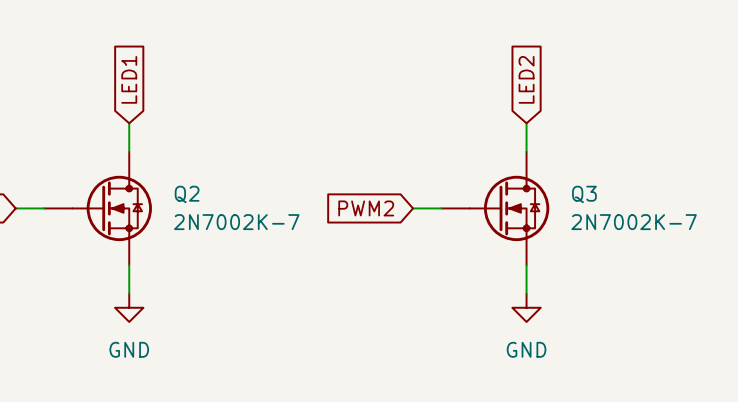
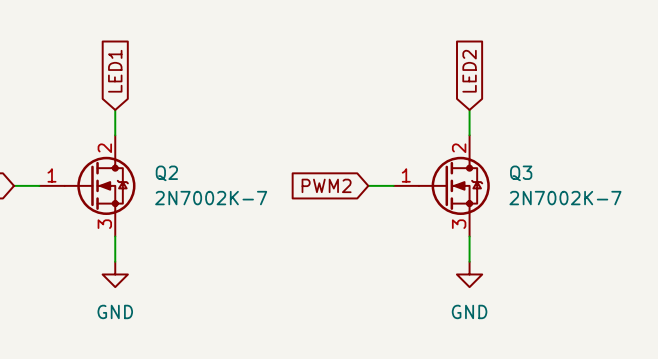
Q2 symbol: [44, 151, 152, 266] -> [39, 135, 136, 237]
Q3 symbol: [441, 151, 550, 266] -> [393, 135, 490, 237]

